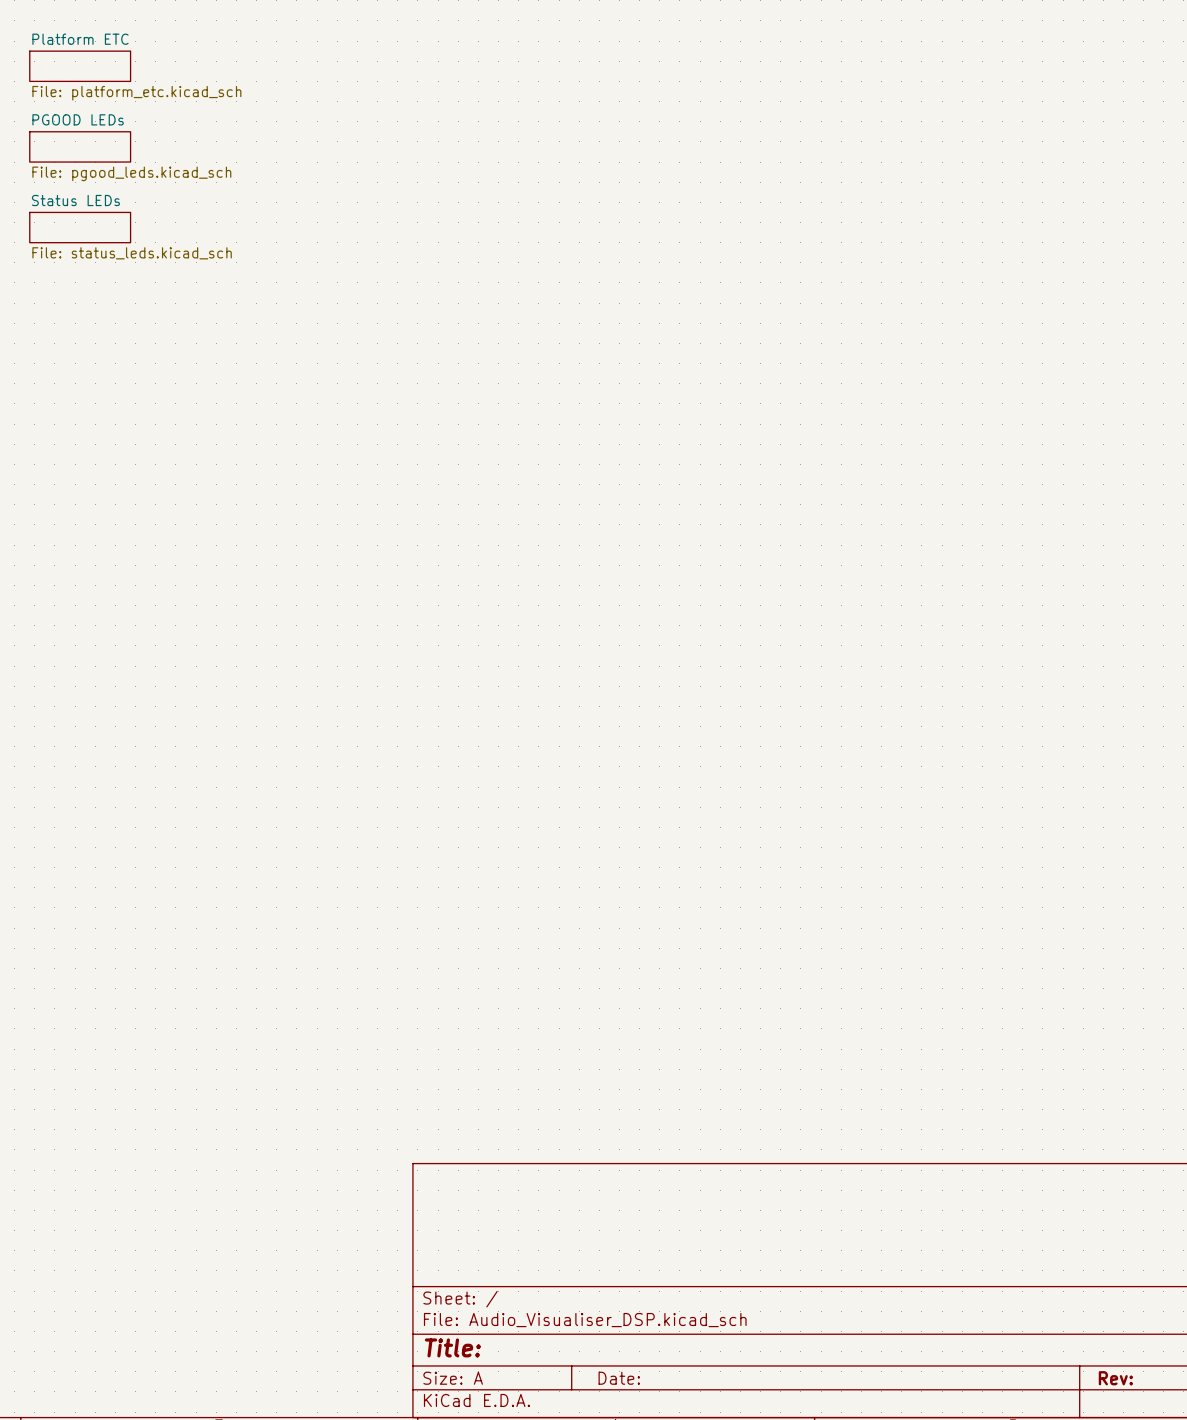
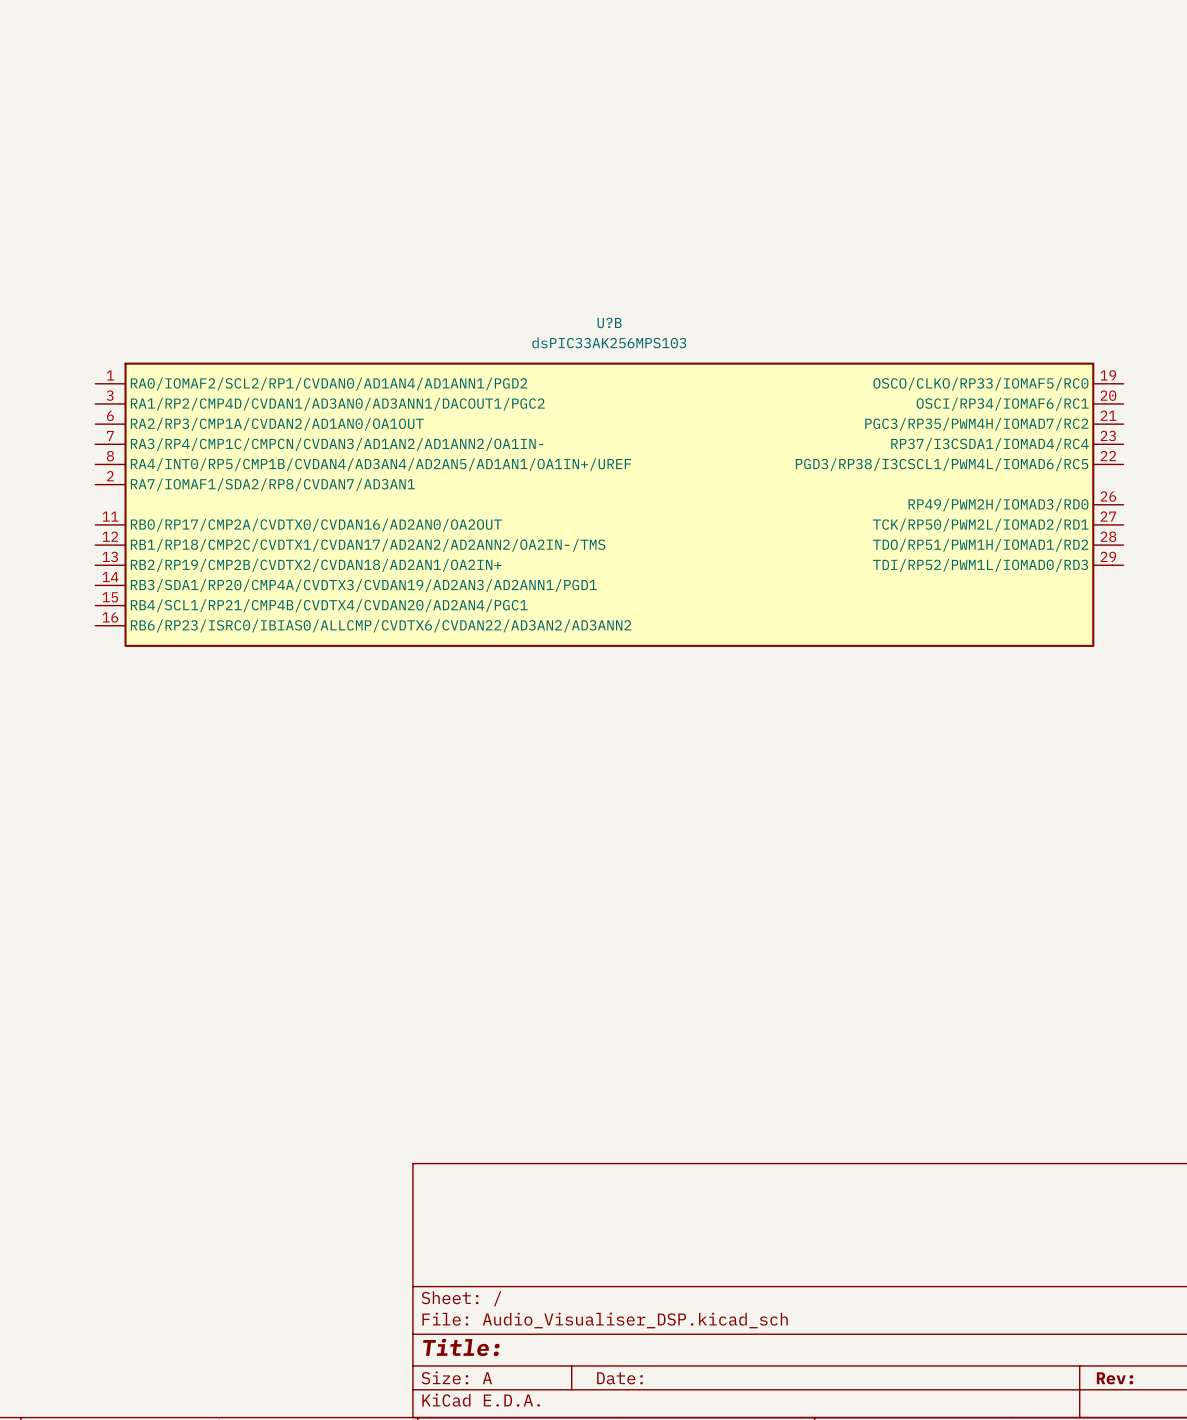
sheet Platform ETC: File: platform_etc.kicad_sch (80, 66) -> none
sheet PGOOD LEDs: File: pgood_leds.kicad_sch (80, 146) -> none
sheet Status LEDs: File: status_leds.kicad_sch (80, 227) -> none
U?B: none -> dsPIC33AK256MPS103 (609, 504)

